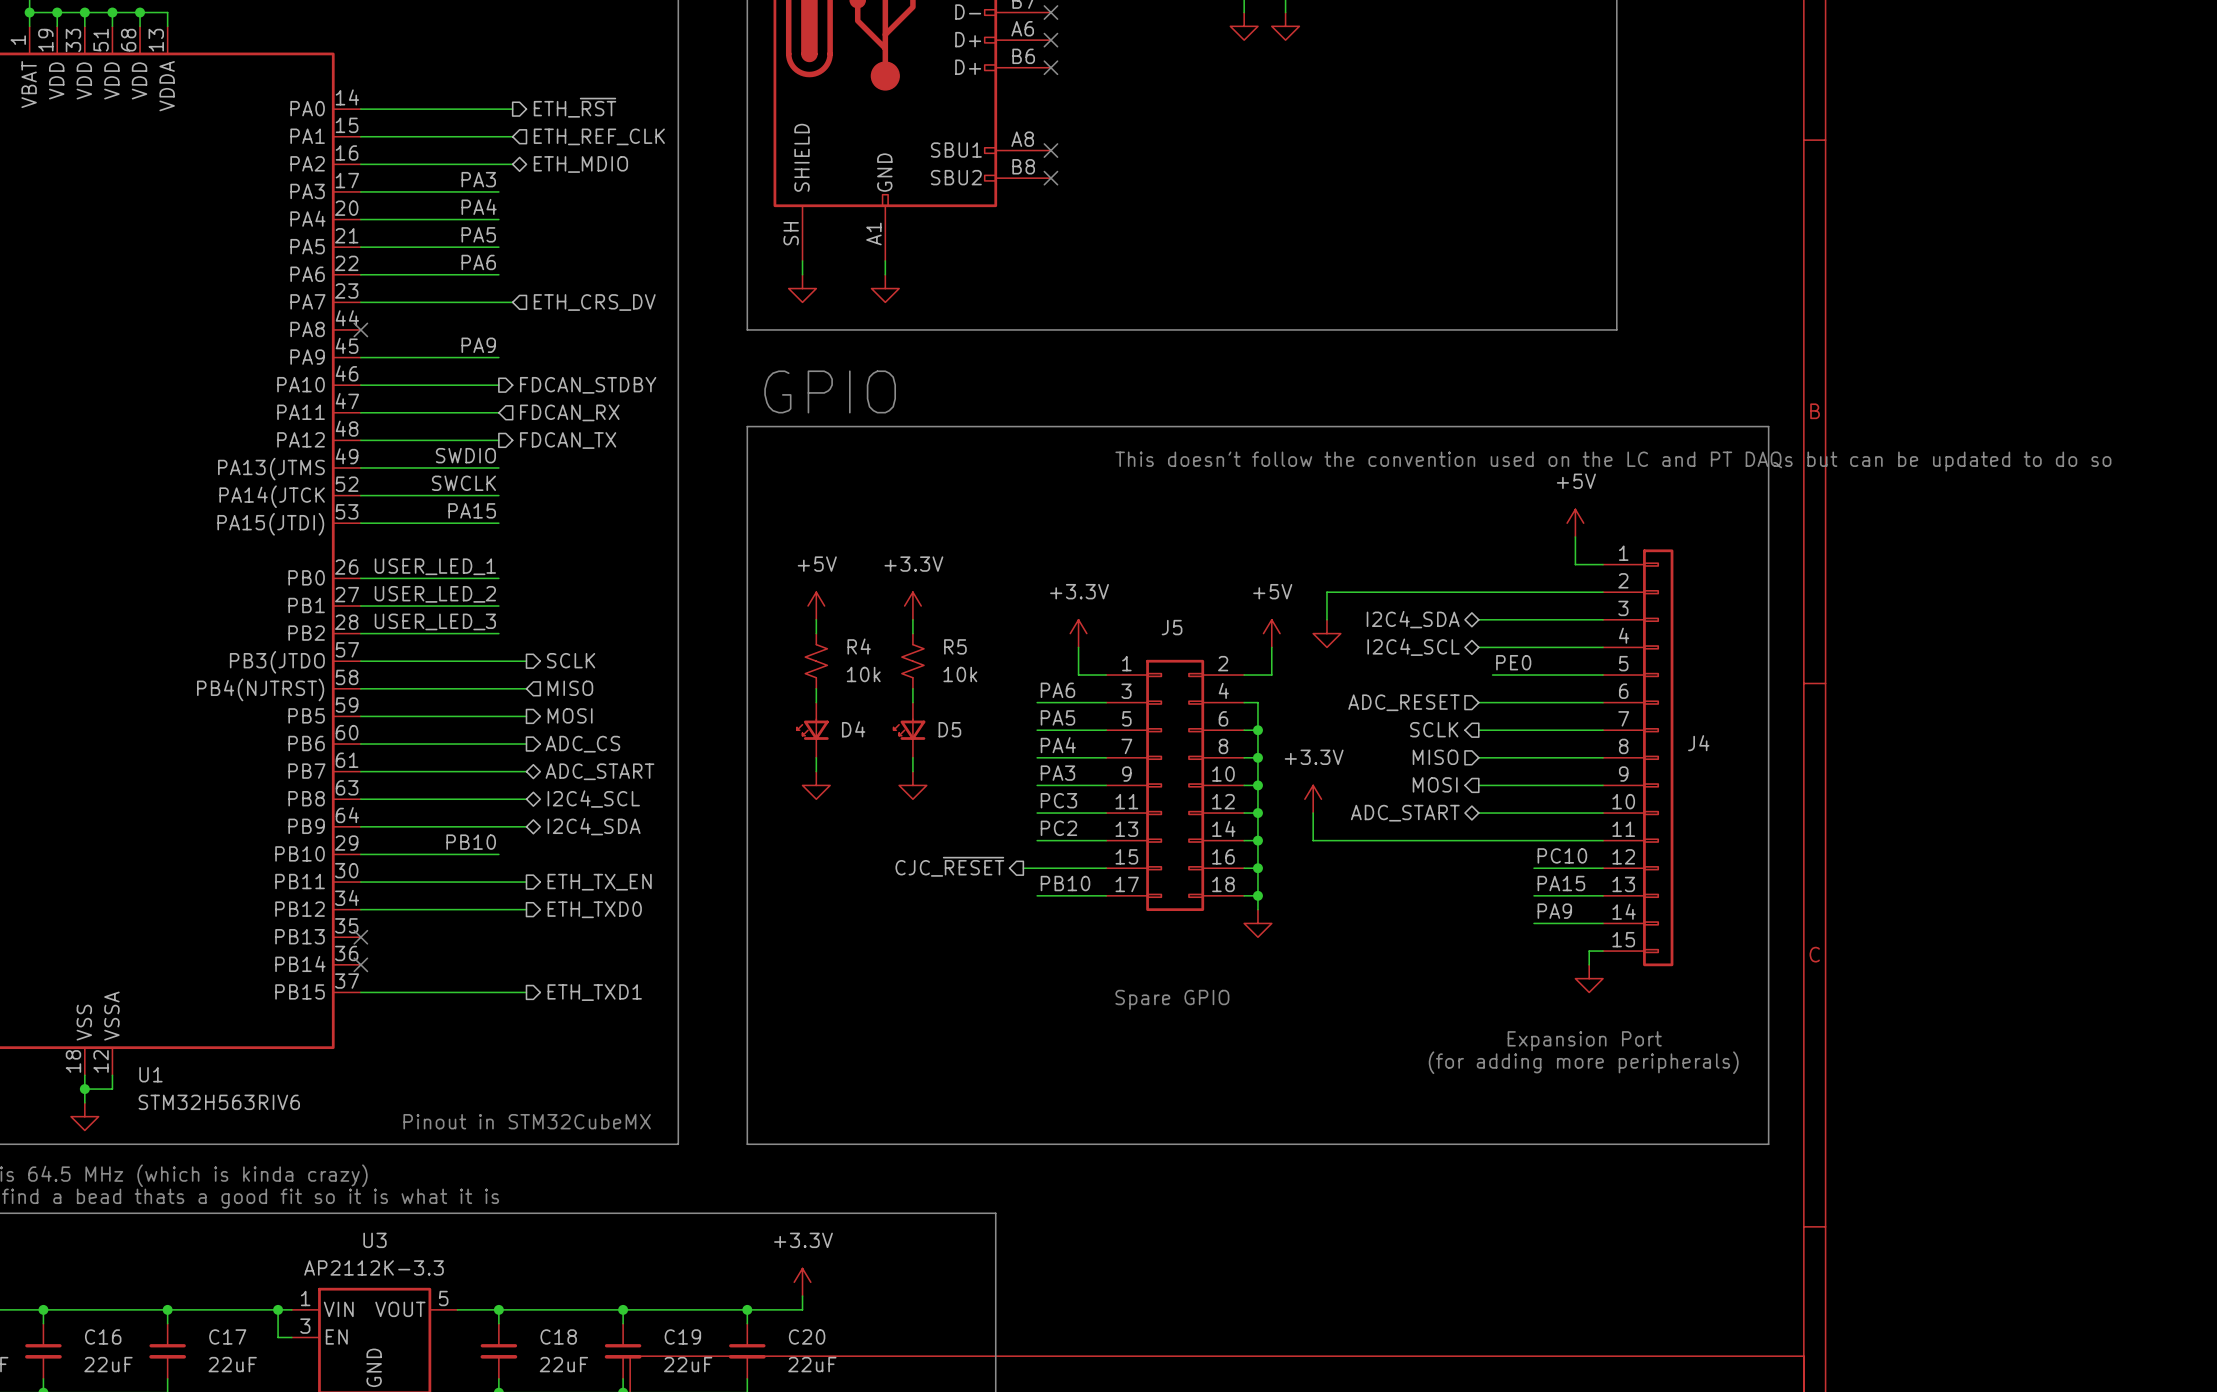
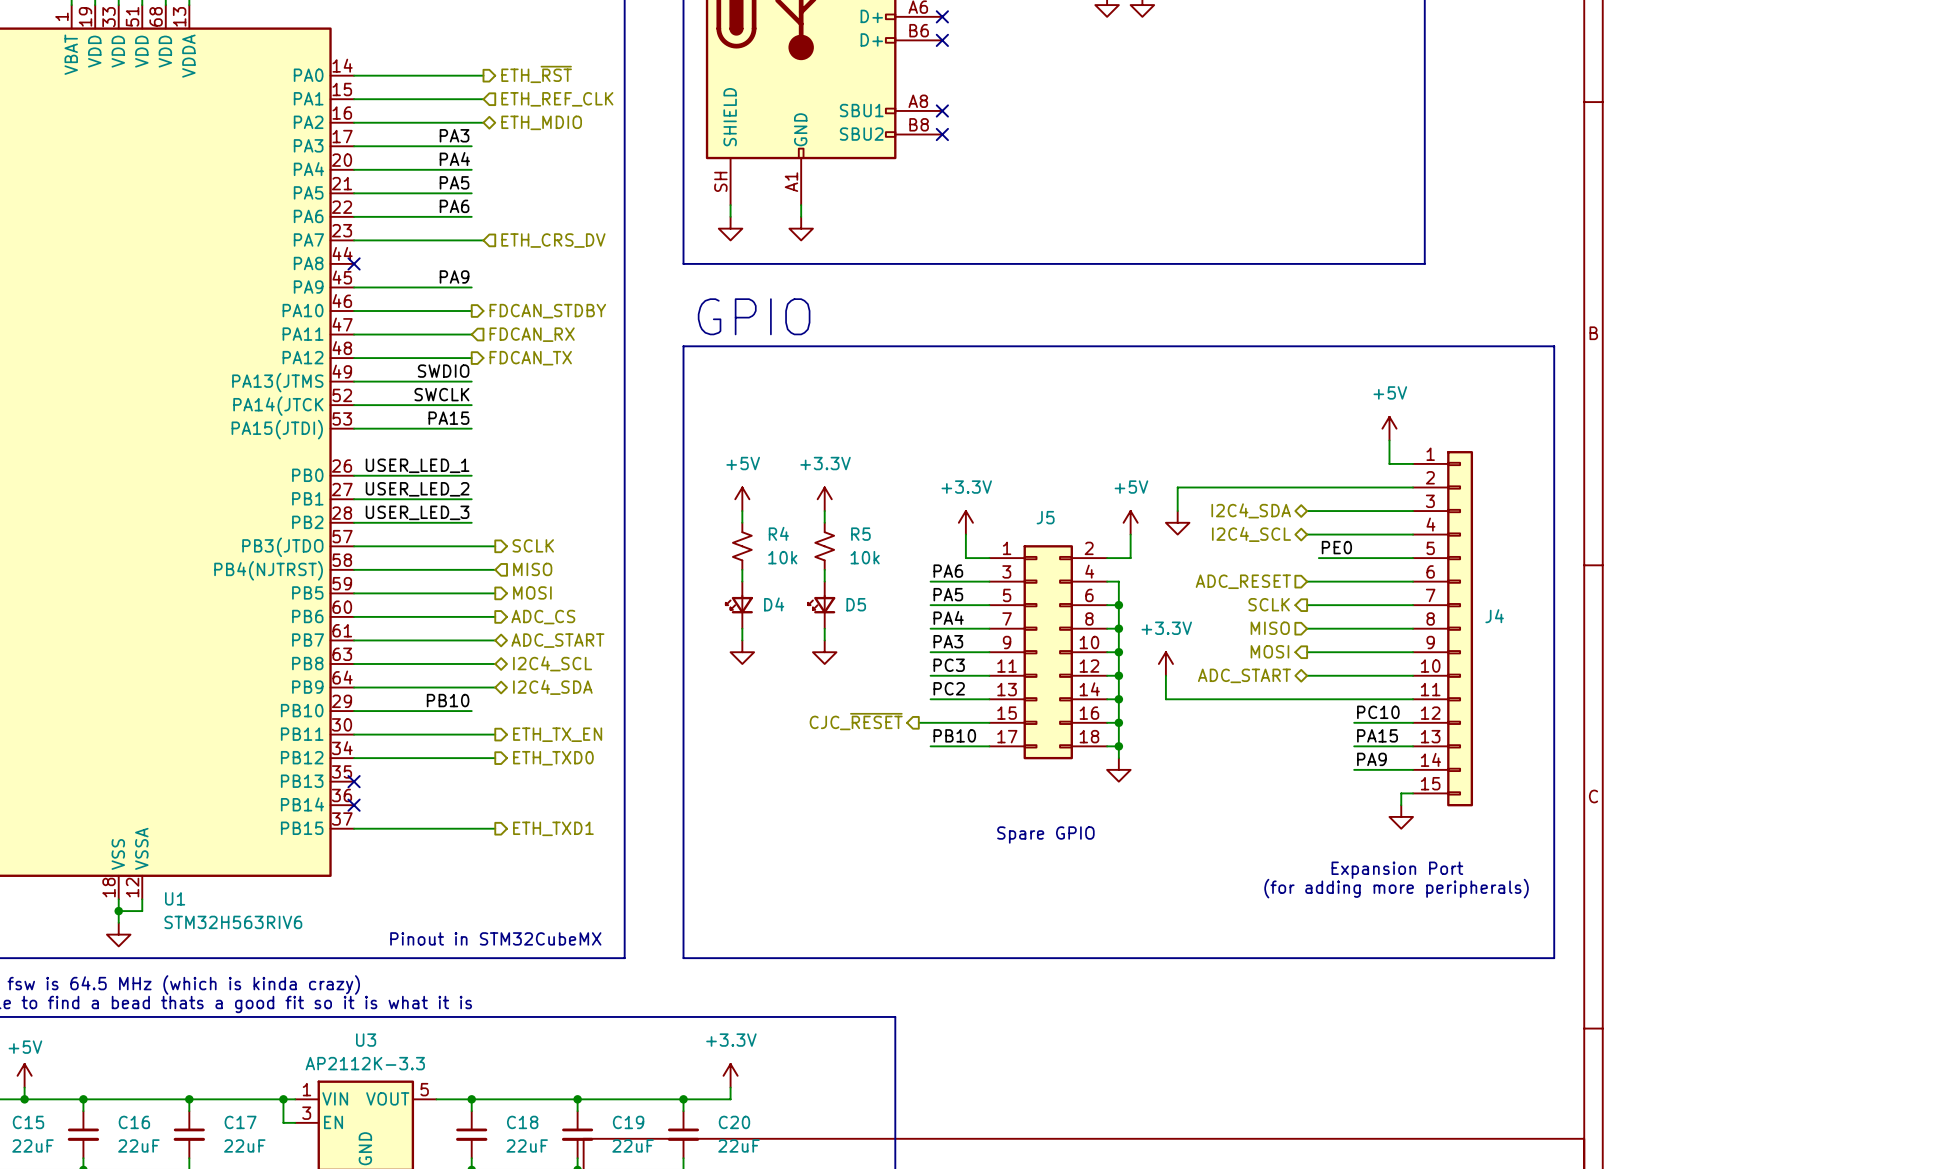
text: This doesn't follow the convention used on the LC and PT DAQs but can be updated to do so (1613, 461) -> none

